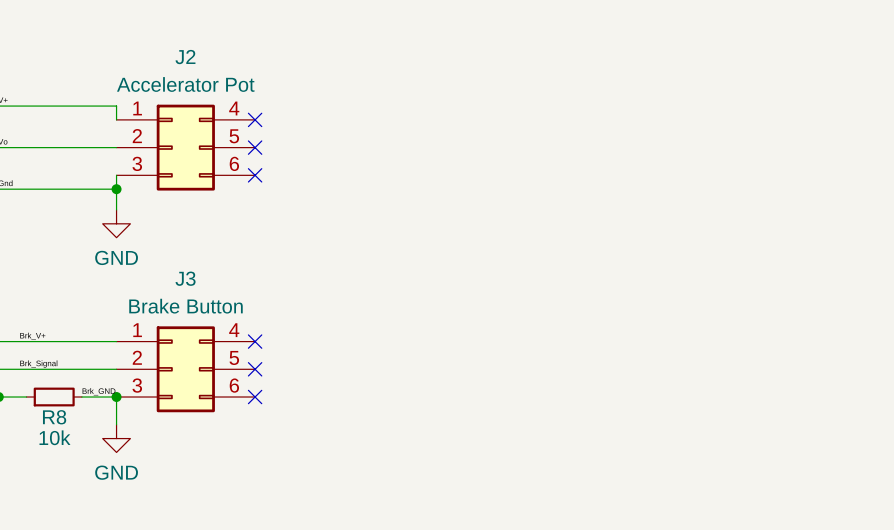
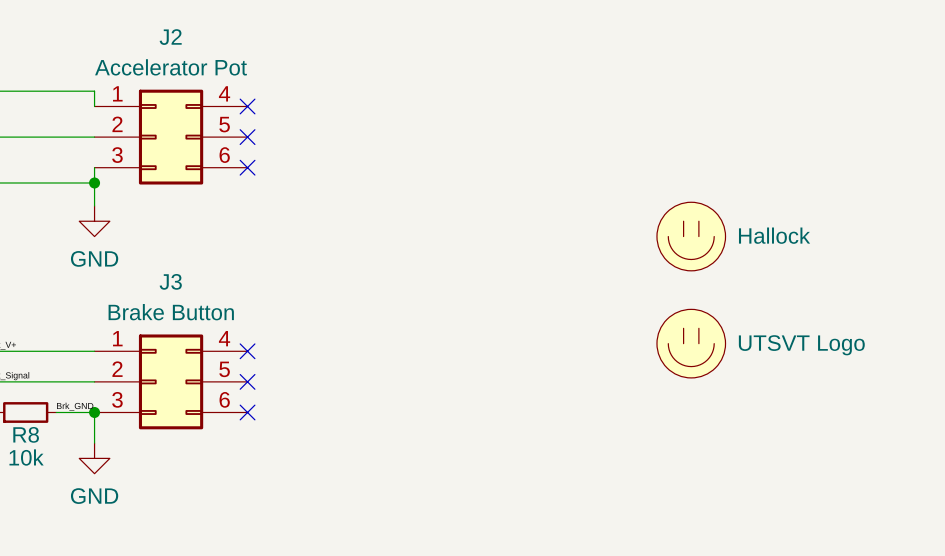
part: none -> Hallock (691, 236)
part: none -> UTSVT Logo (691, 343)

